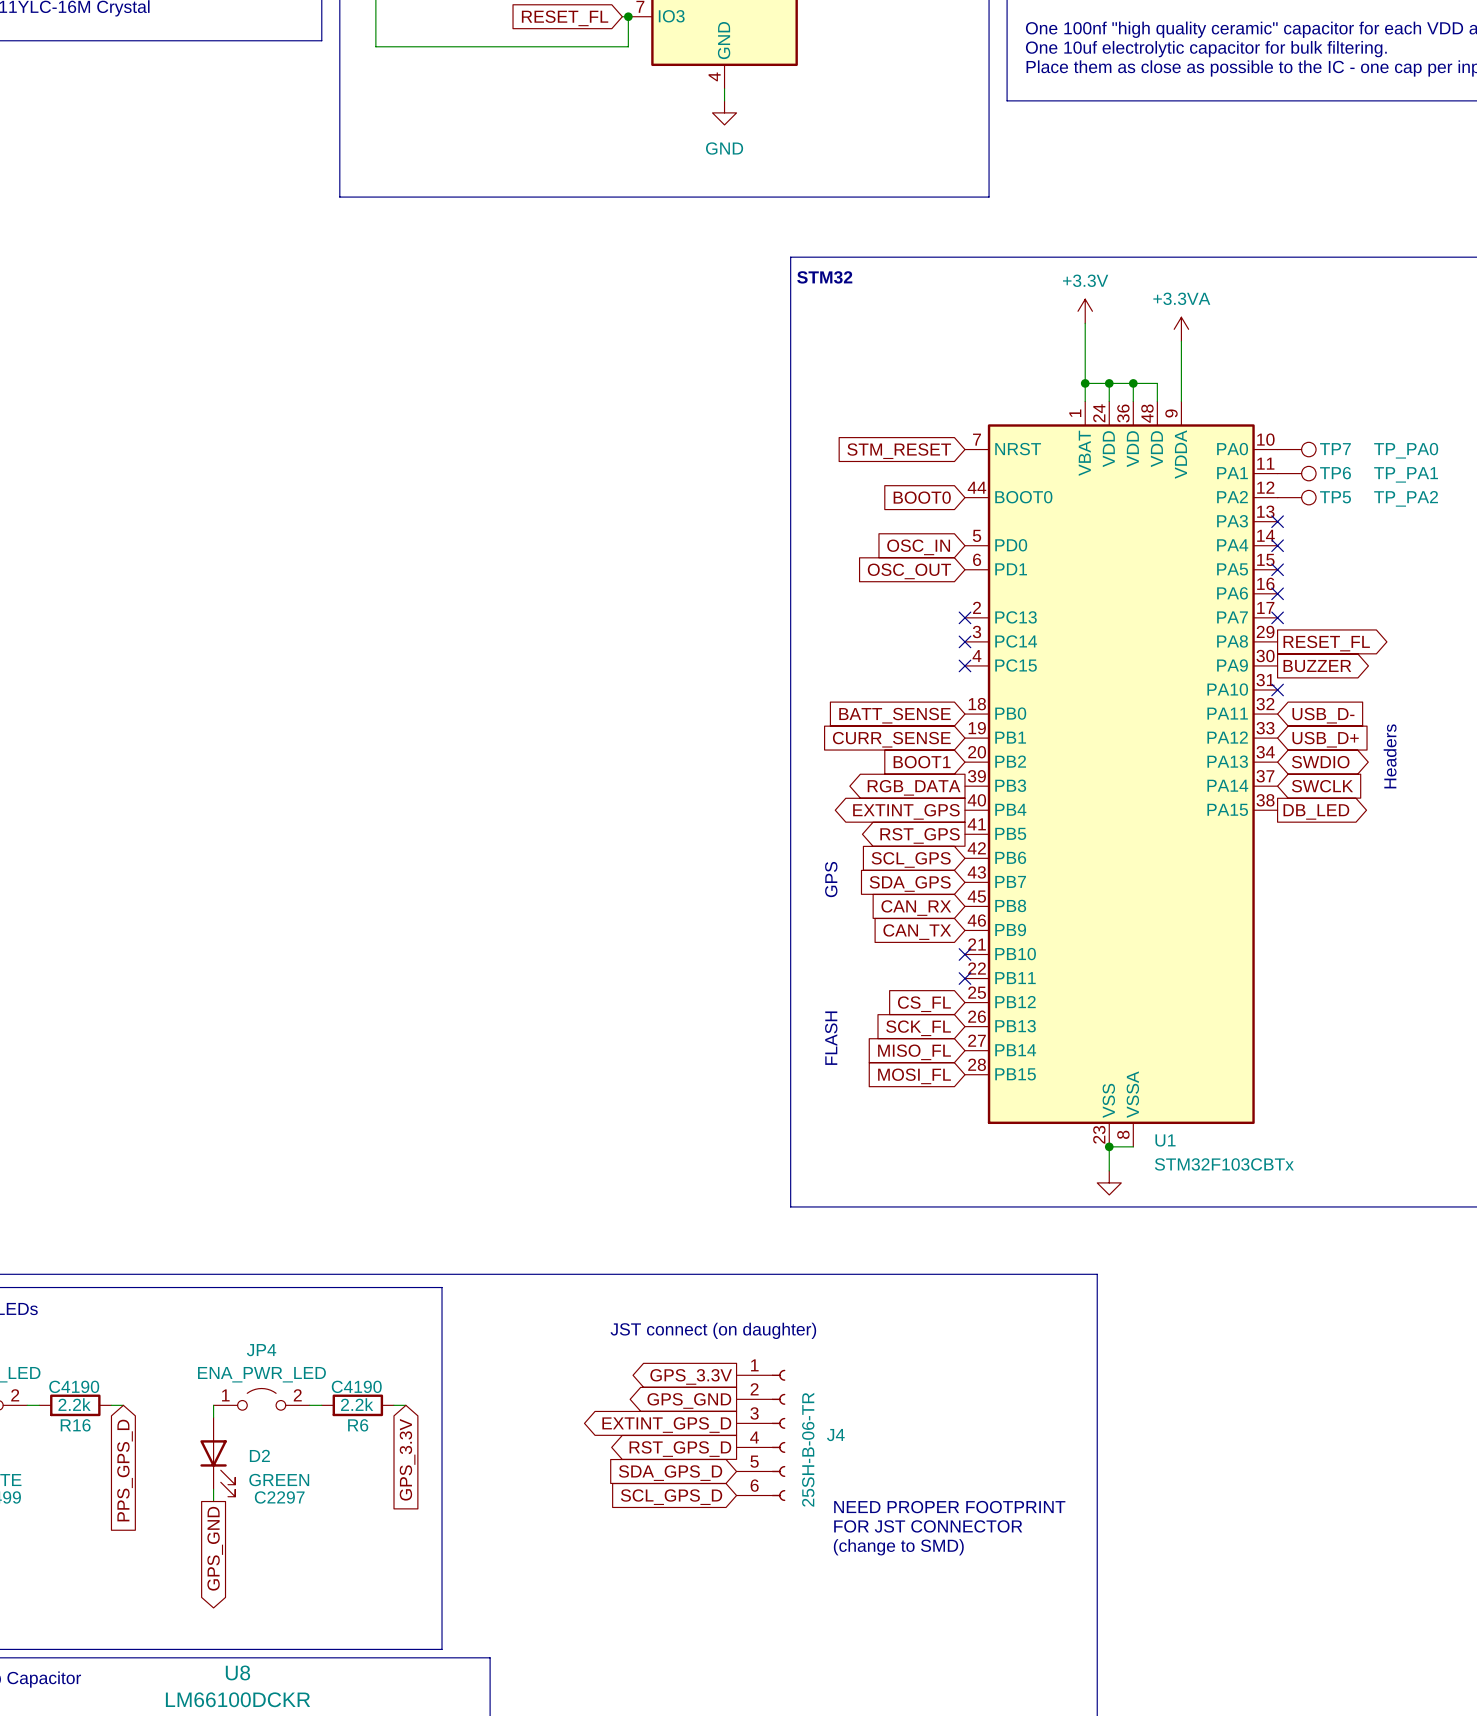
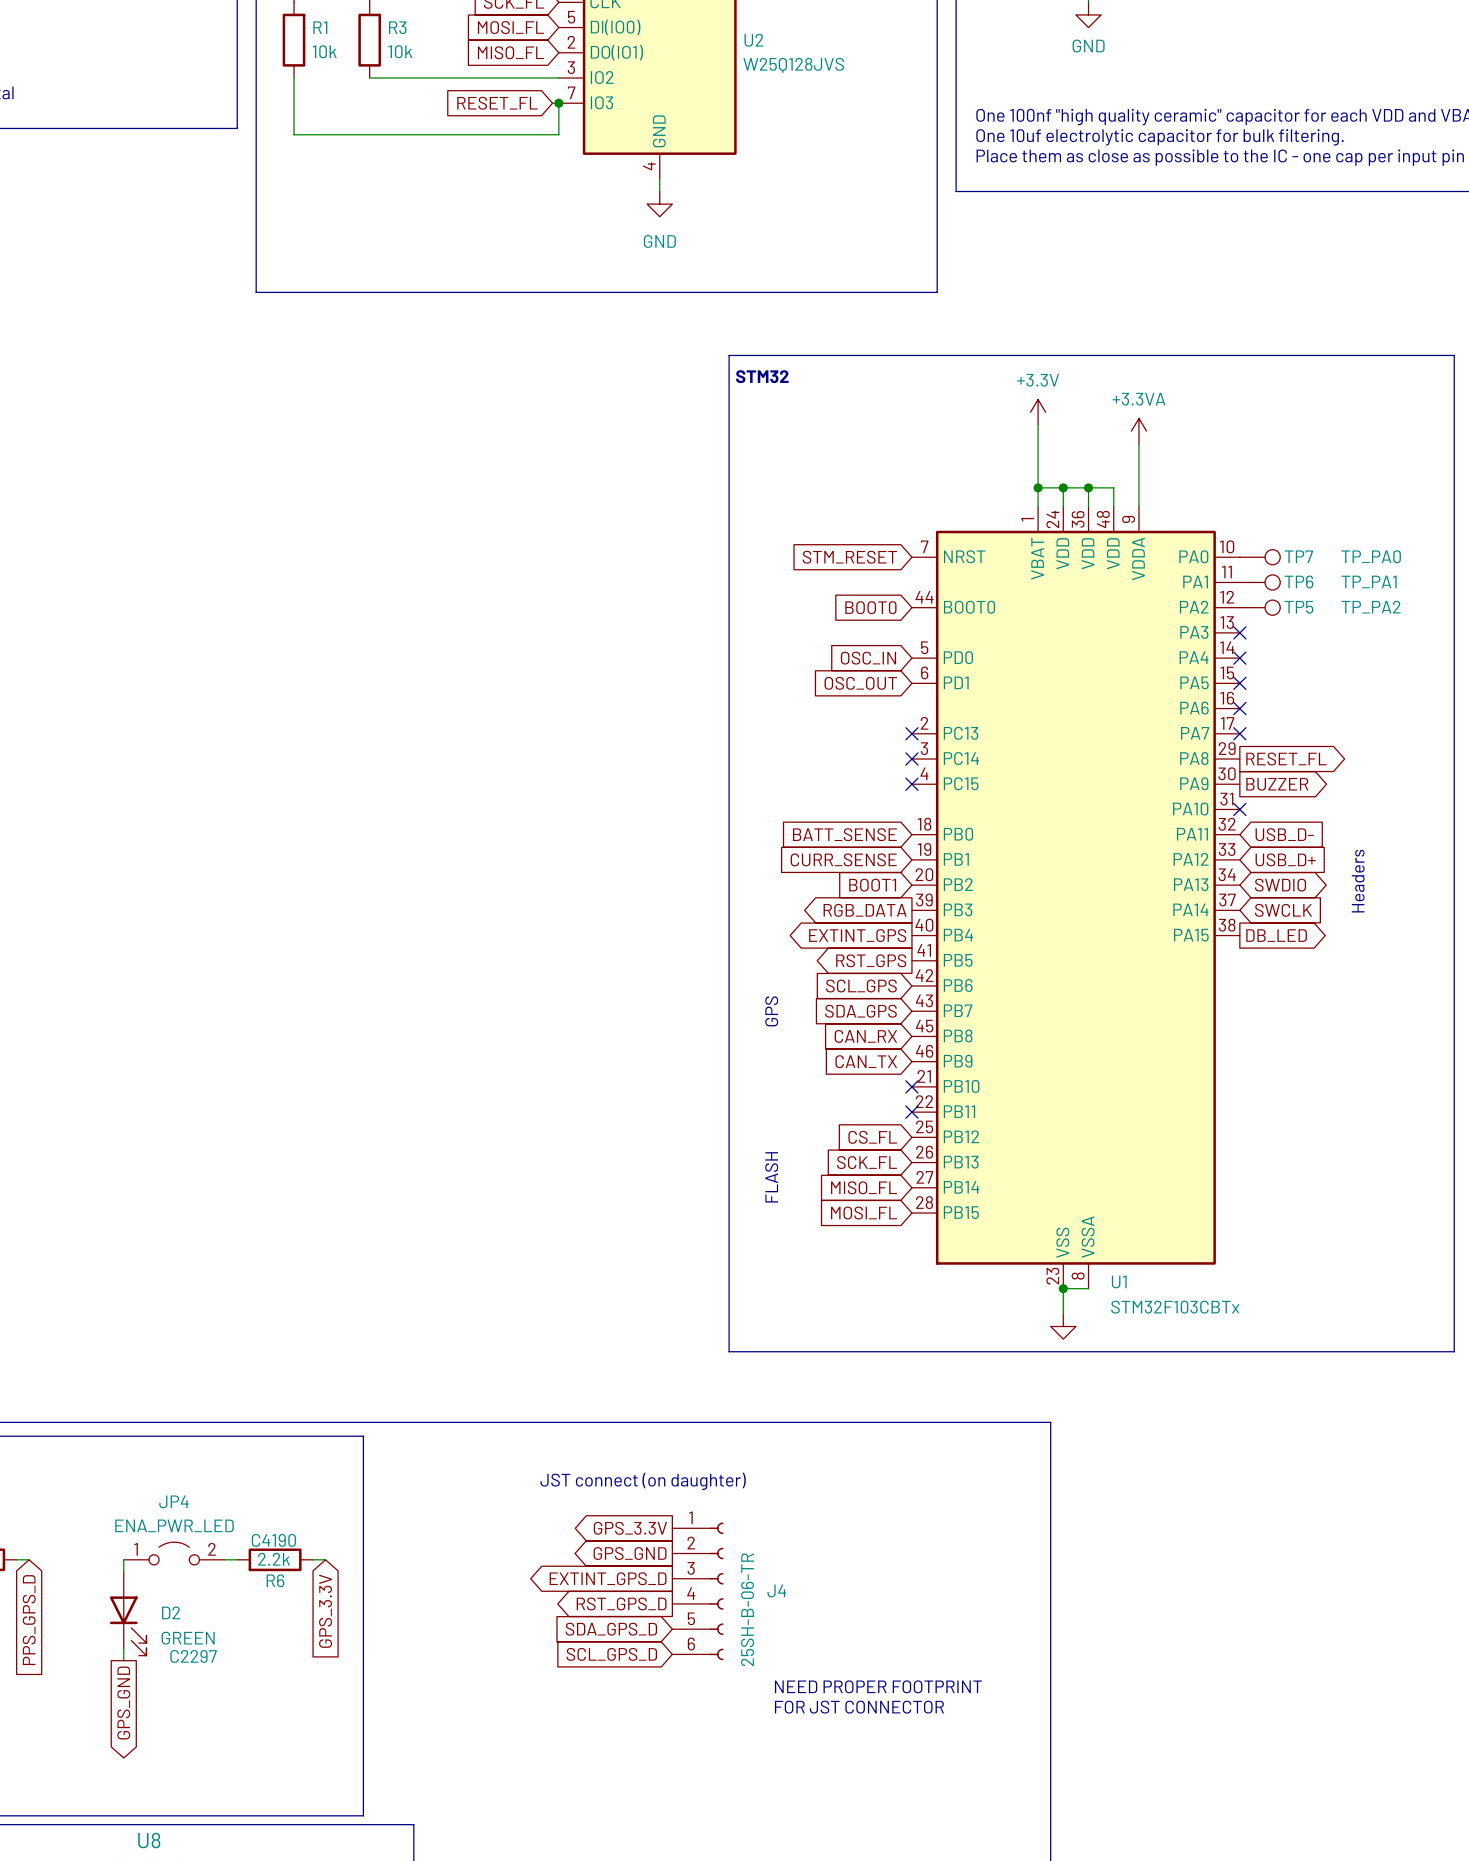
text: NEED PROPER FOOTPRINT (949, 1507) -> none
text: FOR JST CONNECTOR (928, 1526) -> NEED PROPER FOOTPRINT (878, 1686)
text: (change to SMD) (898, 1547) -> FOR JST CONNECTOR (859, 1707)

